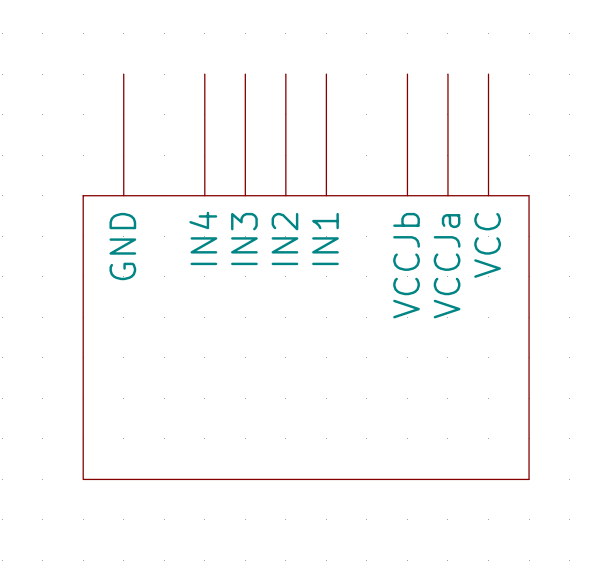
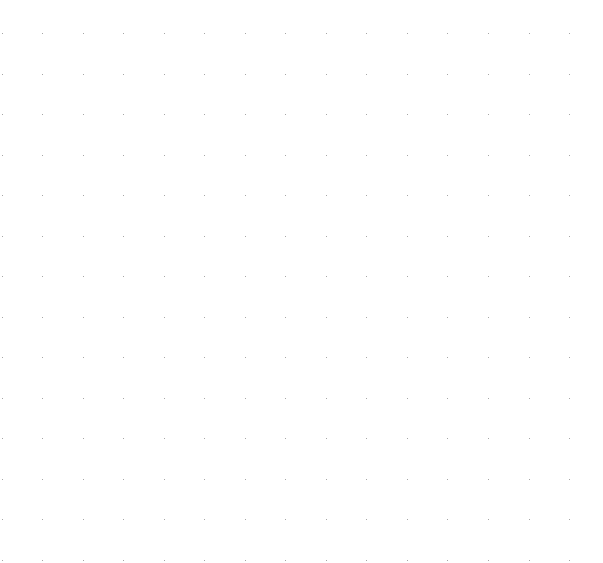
part: (306, 276) -> none

